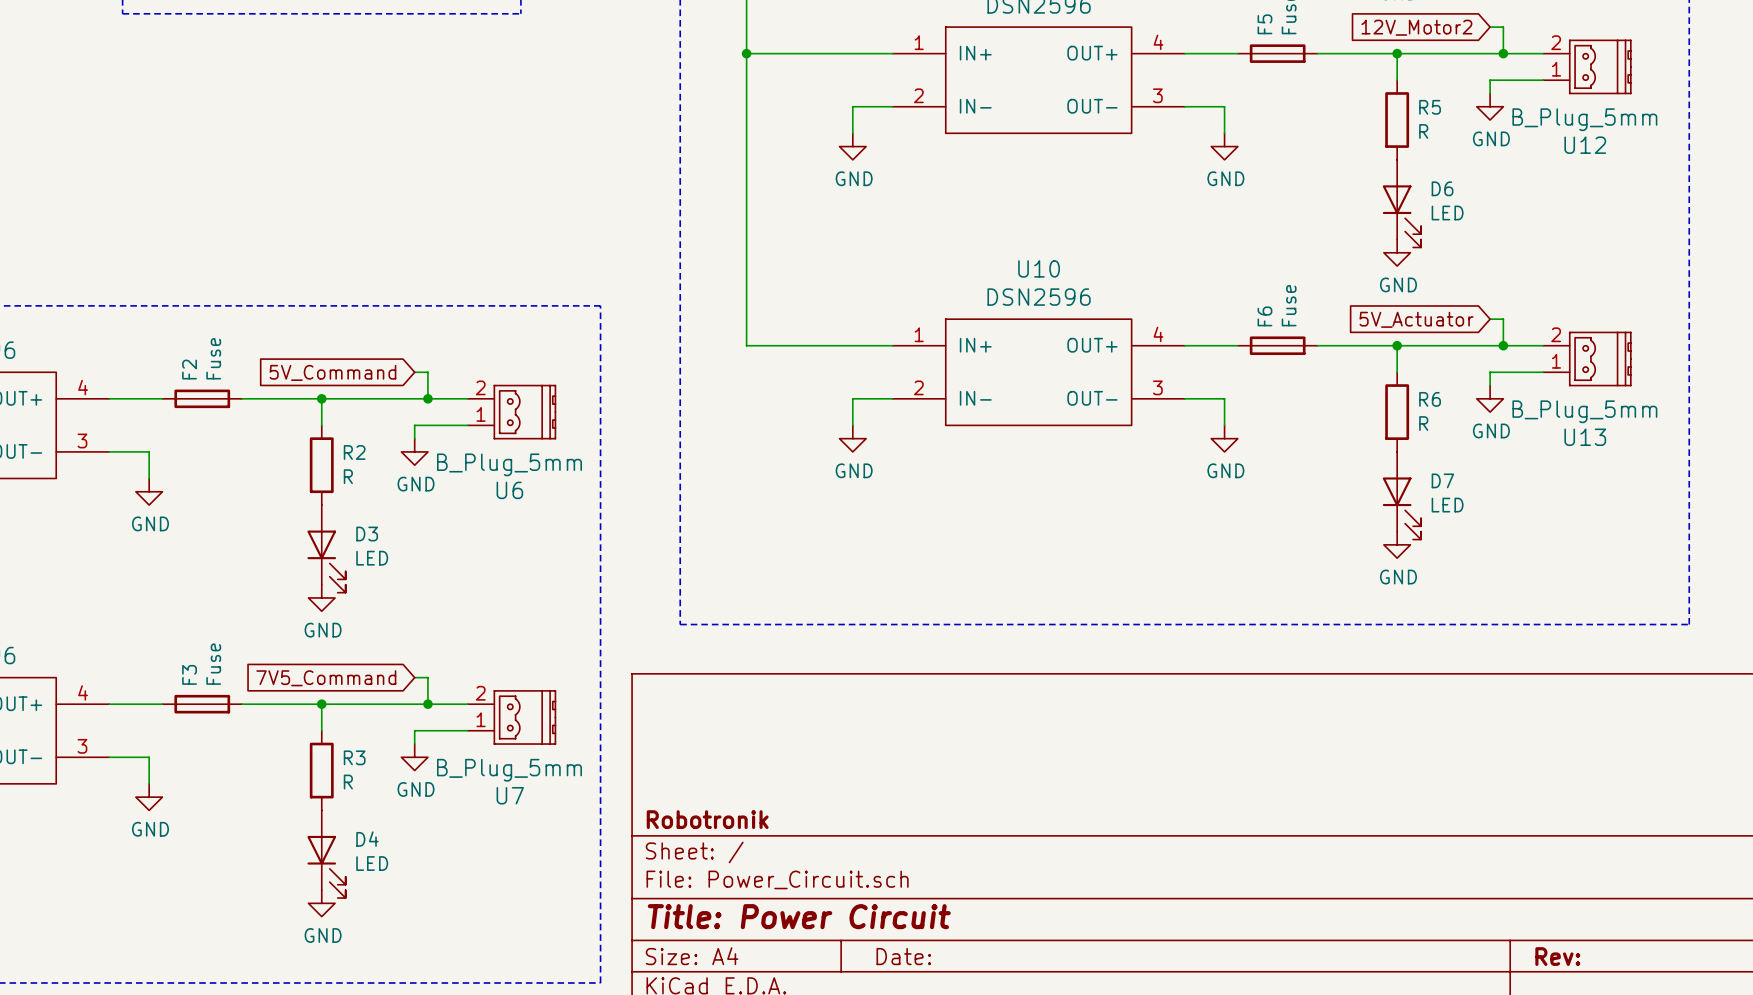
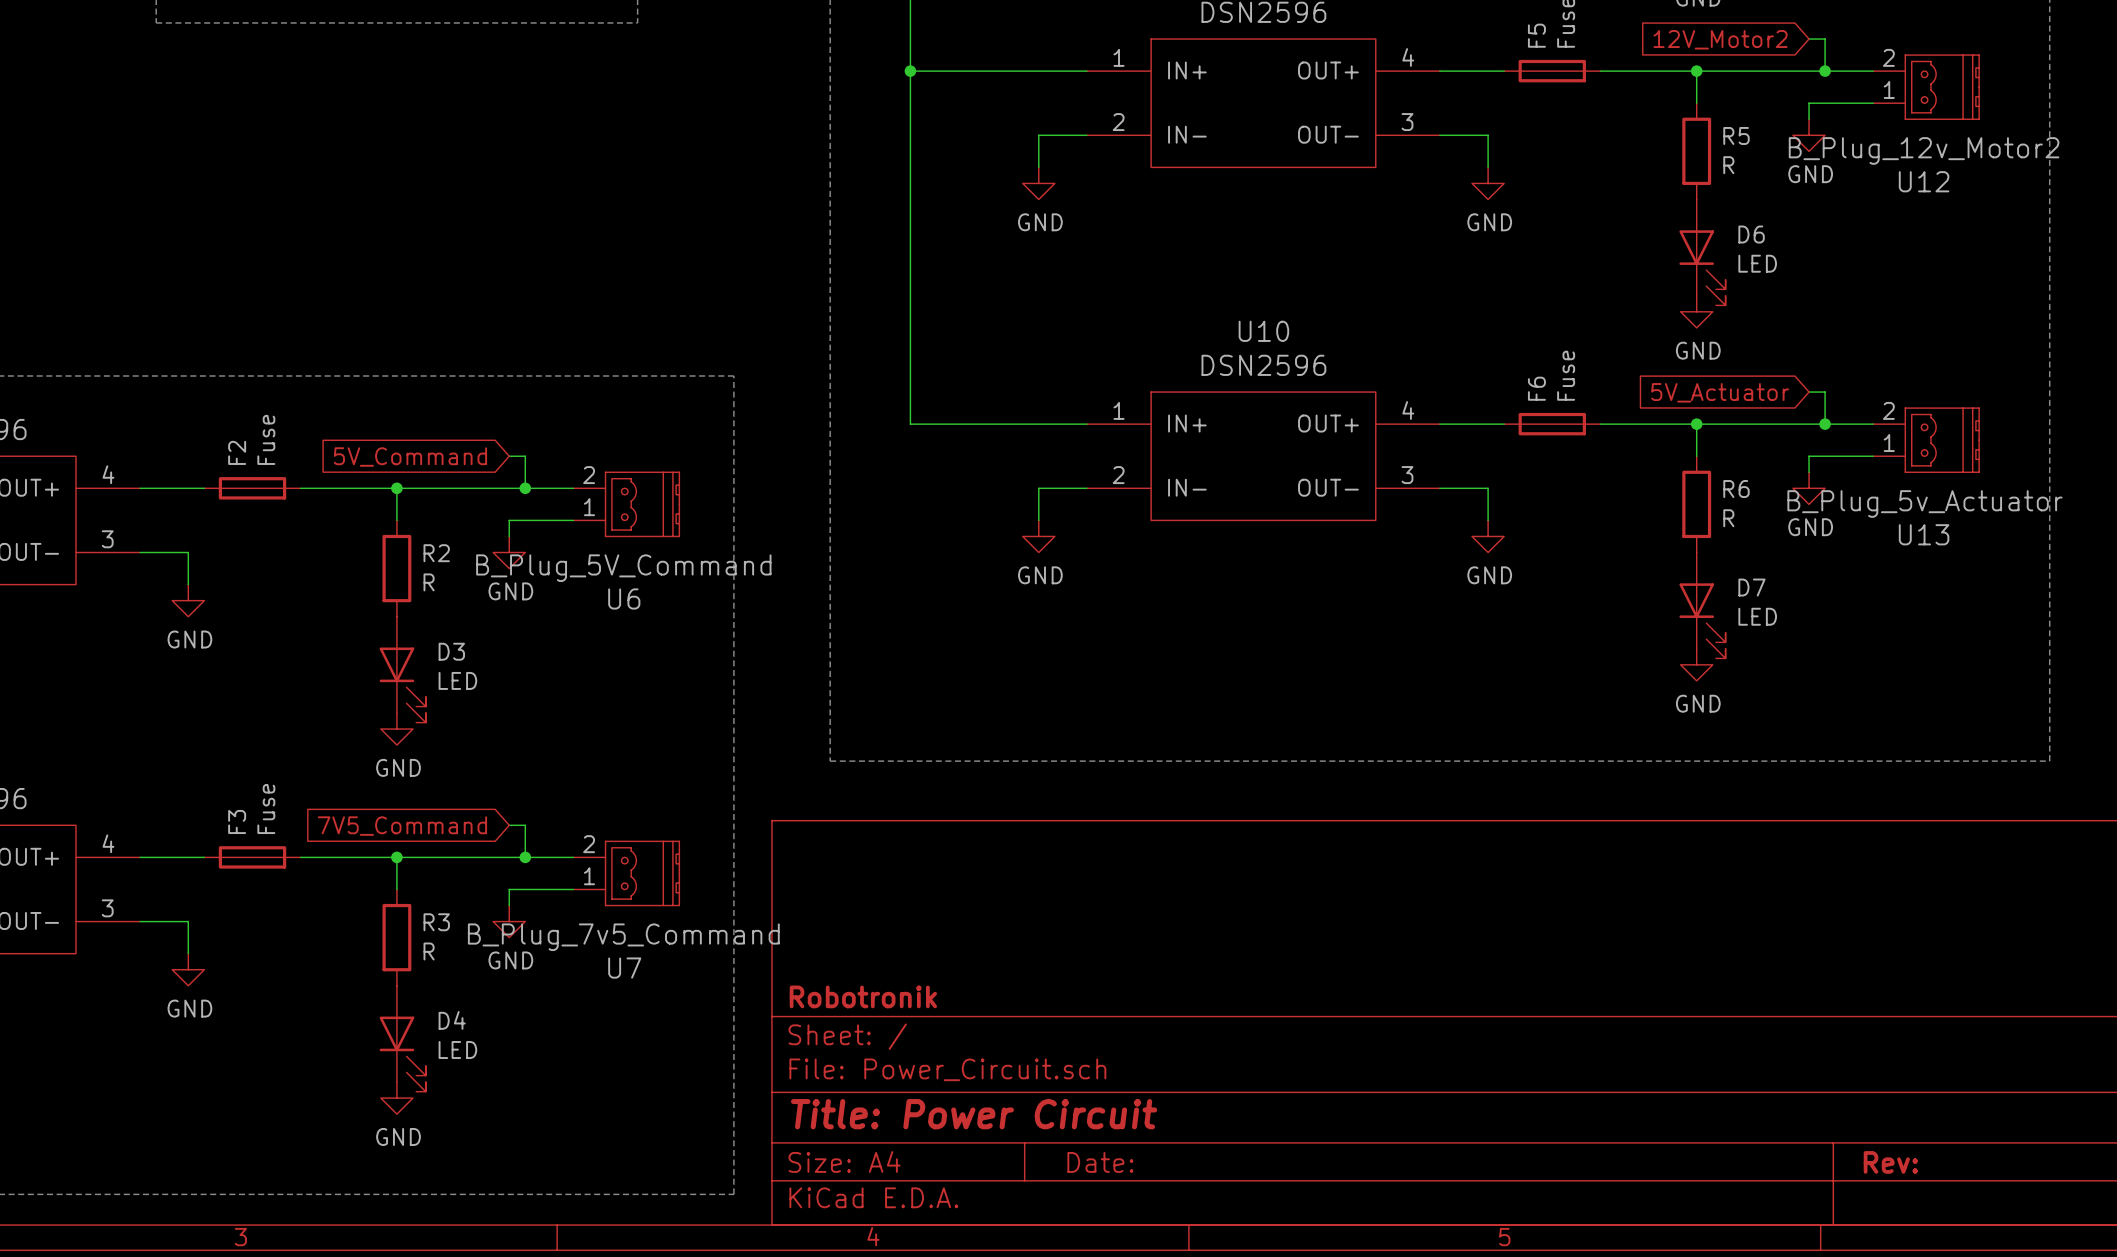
U12 value: B_Plug_5mm (1584, 119) -> B_Plug_12v_Motor2 (1924, 150)
U13 value: B_Plug_5mm (1584, 411) -> B_Plug_5v_Actuator (1924, 503)
U6 value: B_Plug_5mm (509, 464) -> B_Plug_5V_Command (623, 568)
U7 value: B_Plug_5mm (509, 770) -> B_Plug_7v5_Command (623, 937)

